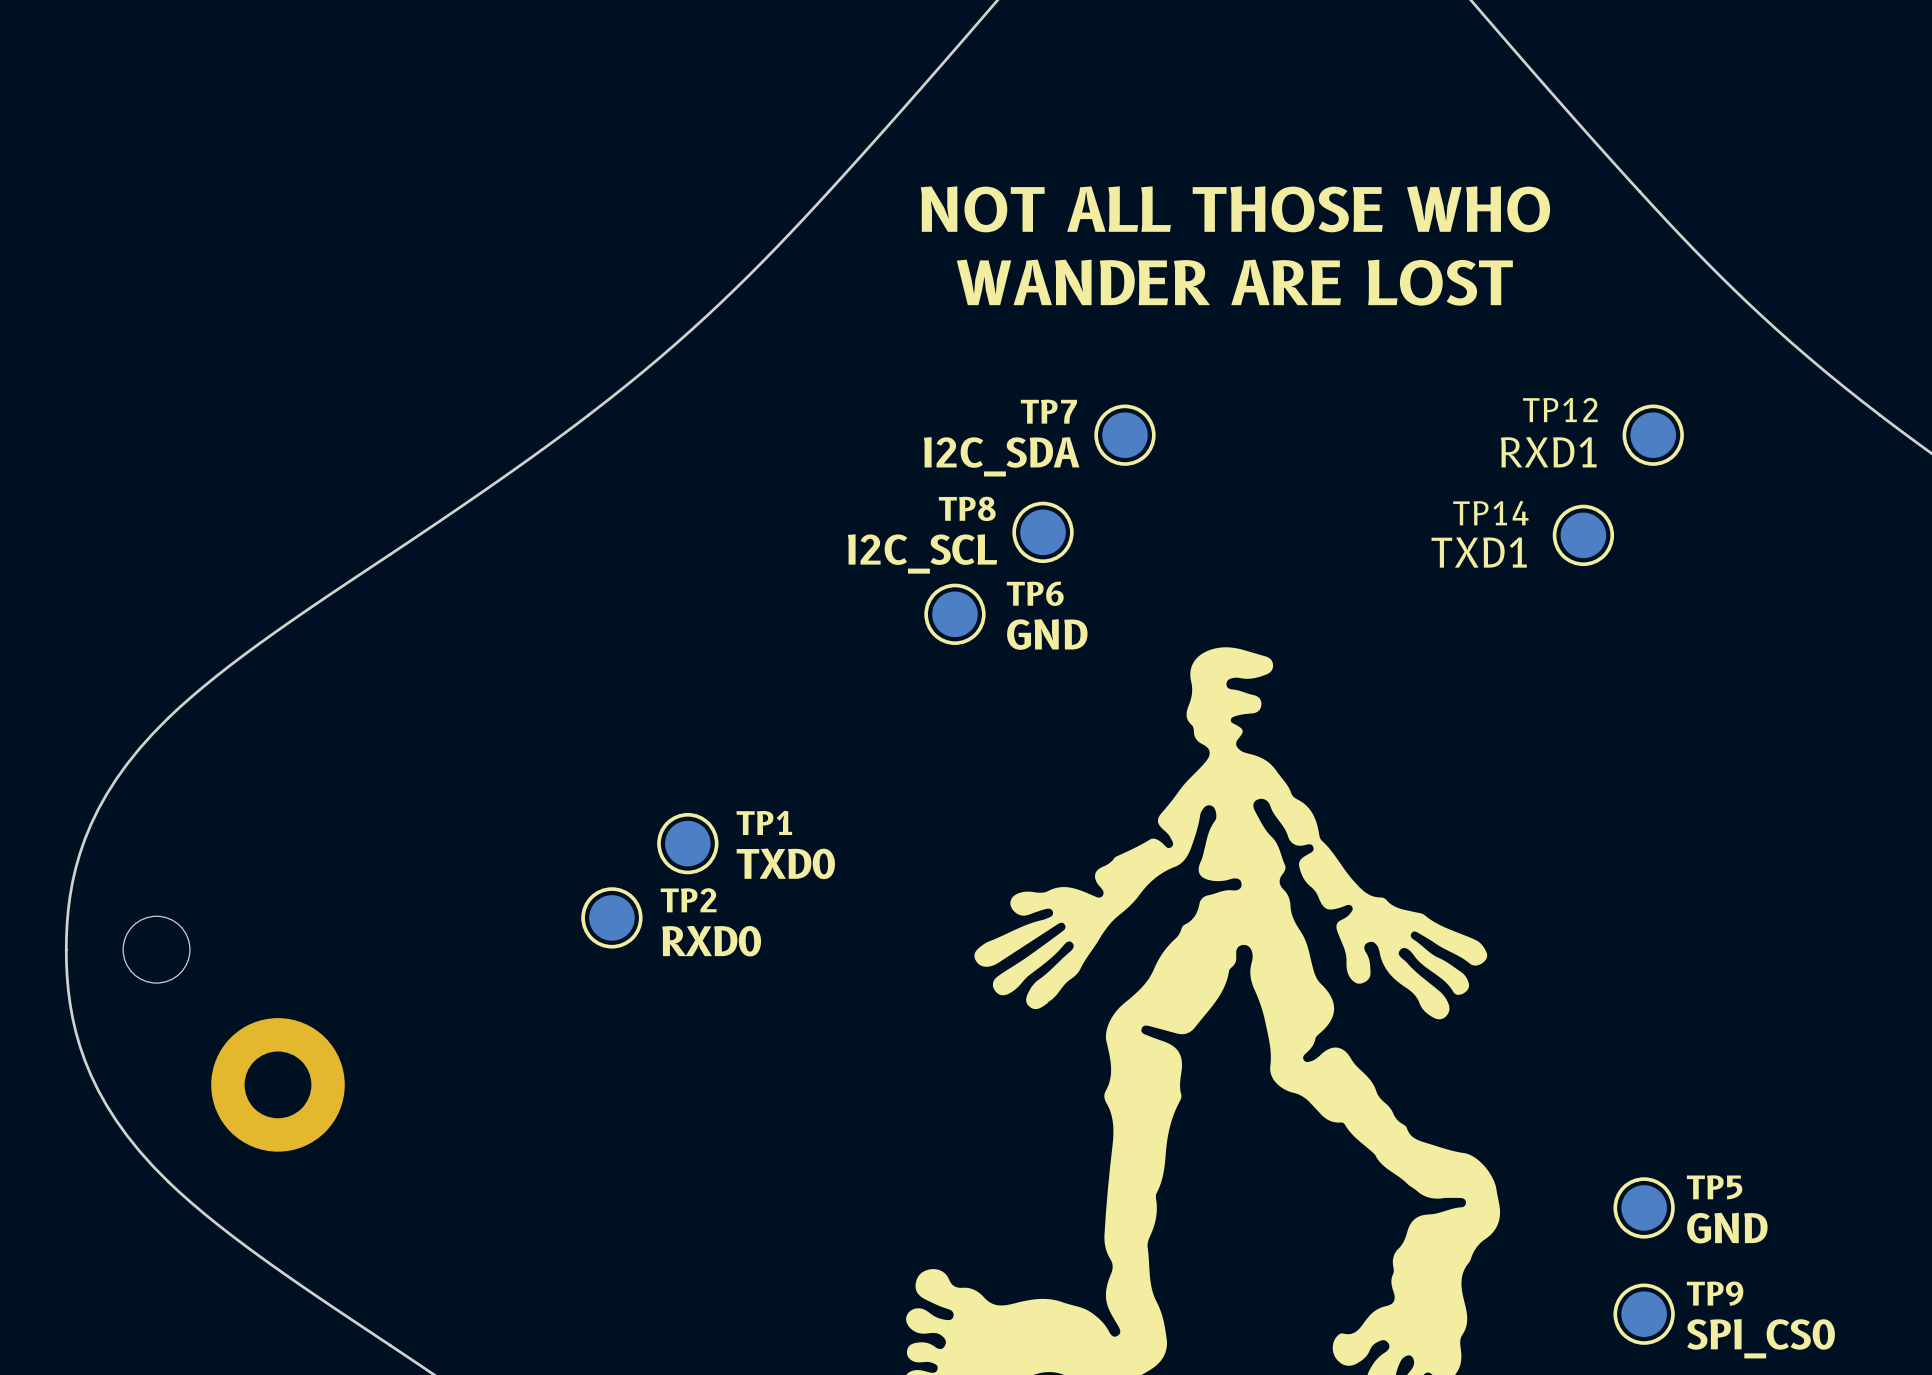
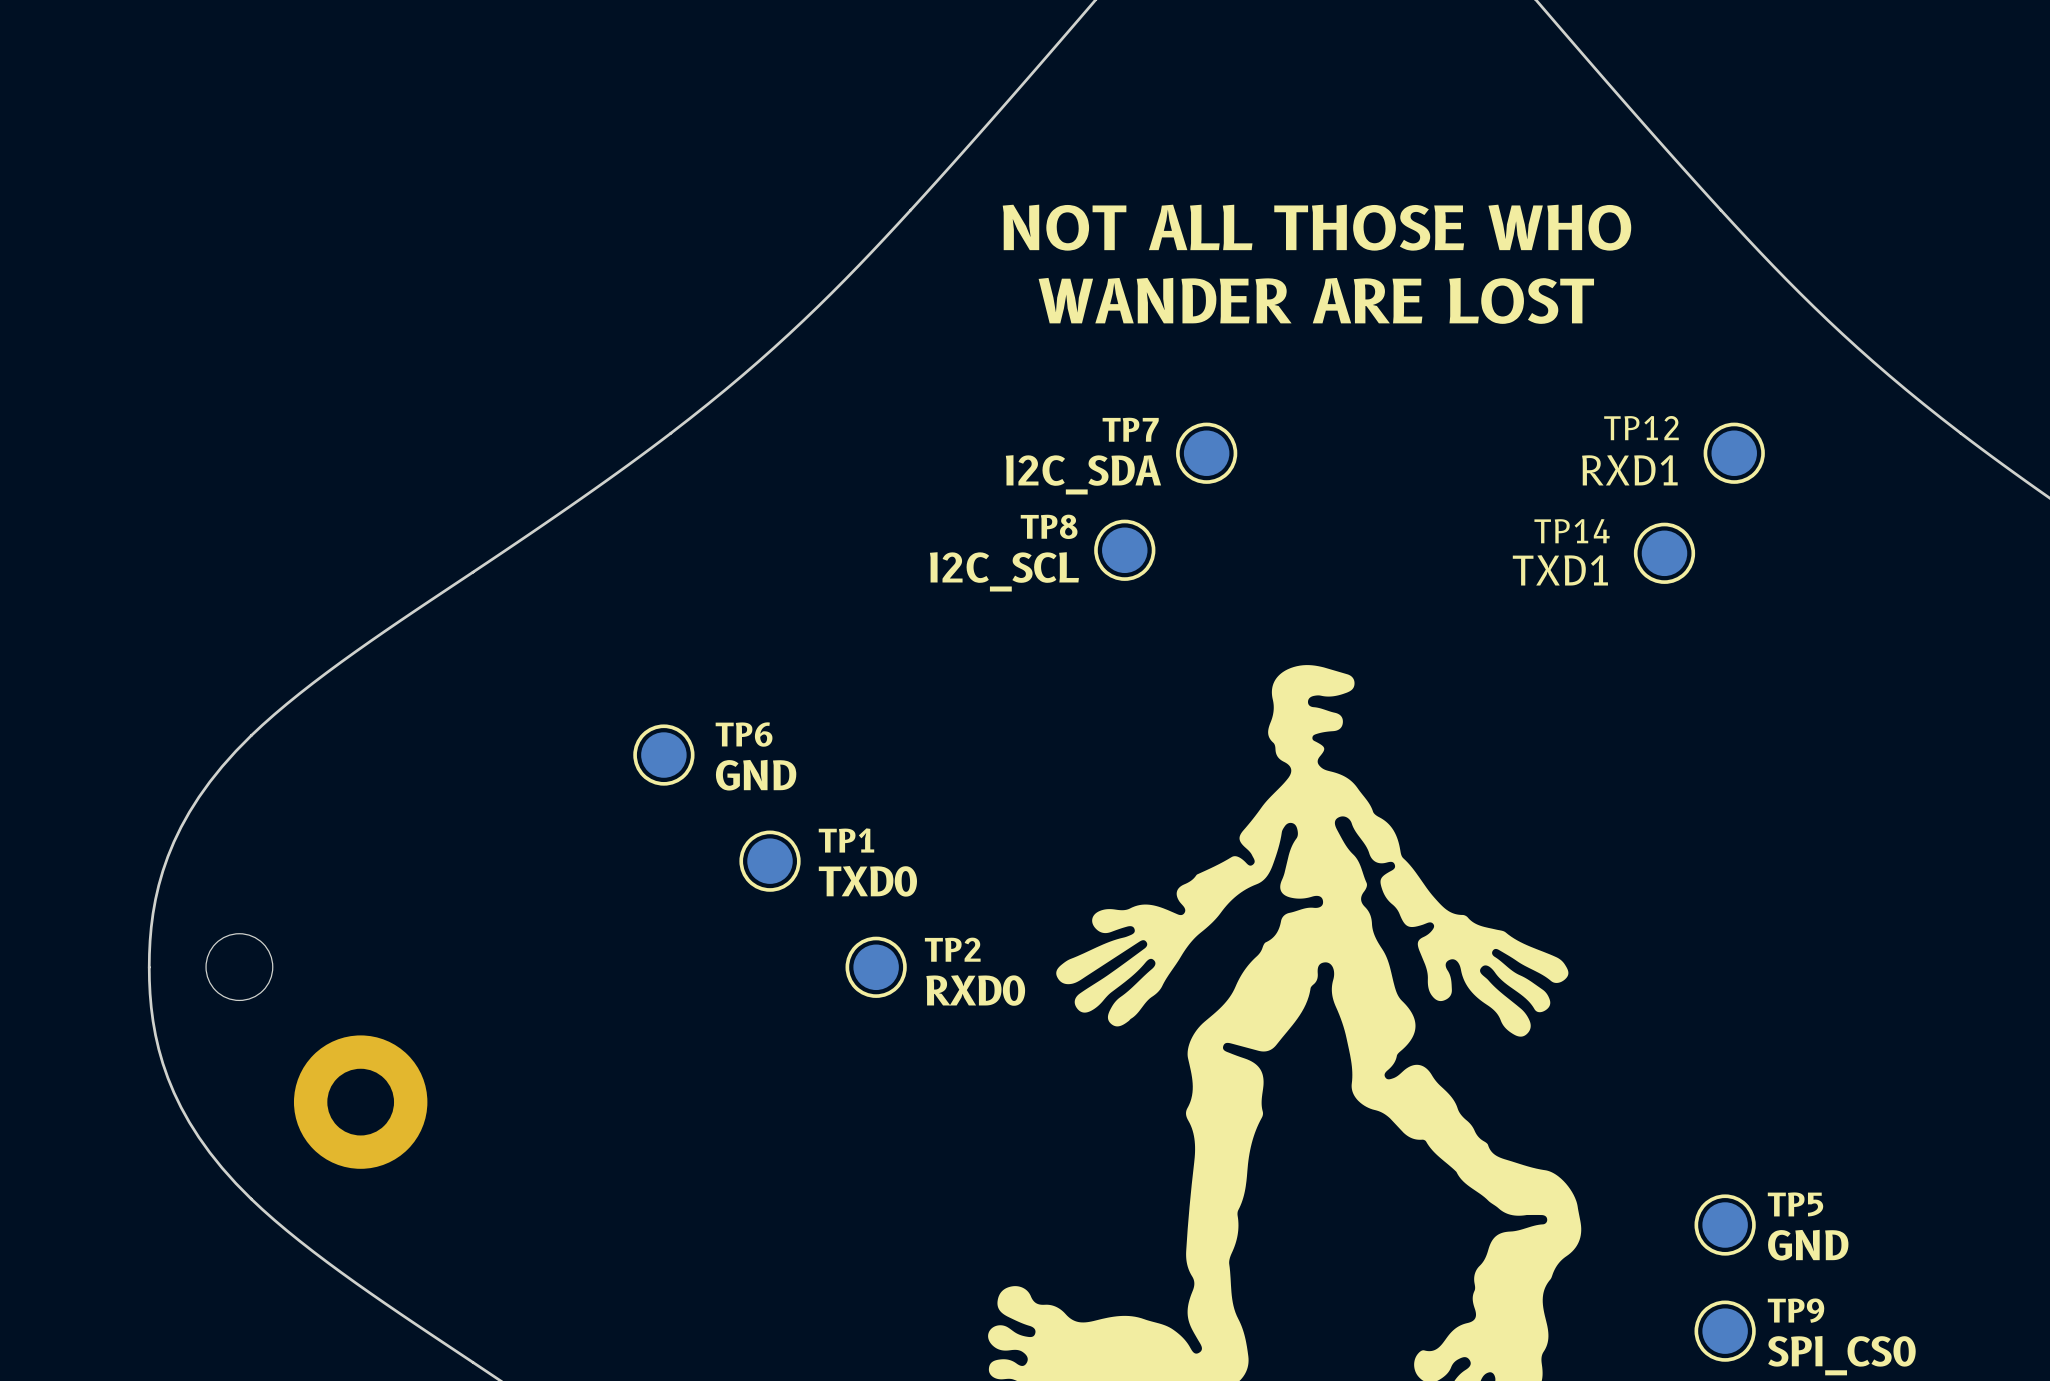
TP6 position: (954, 614) -> (663, 755)
TP2 position: (611, 917) -> (876, 967)

